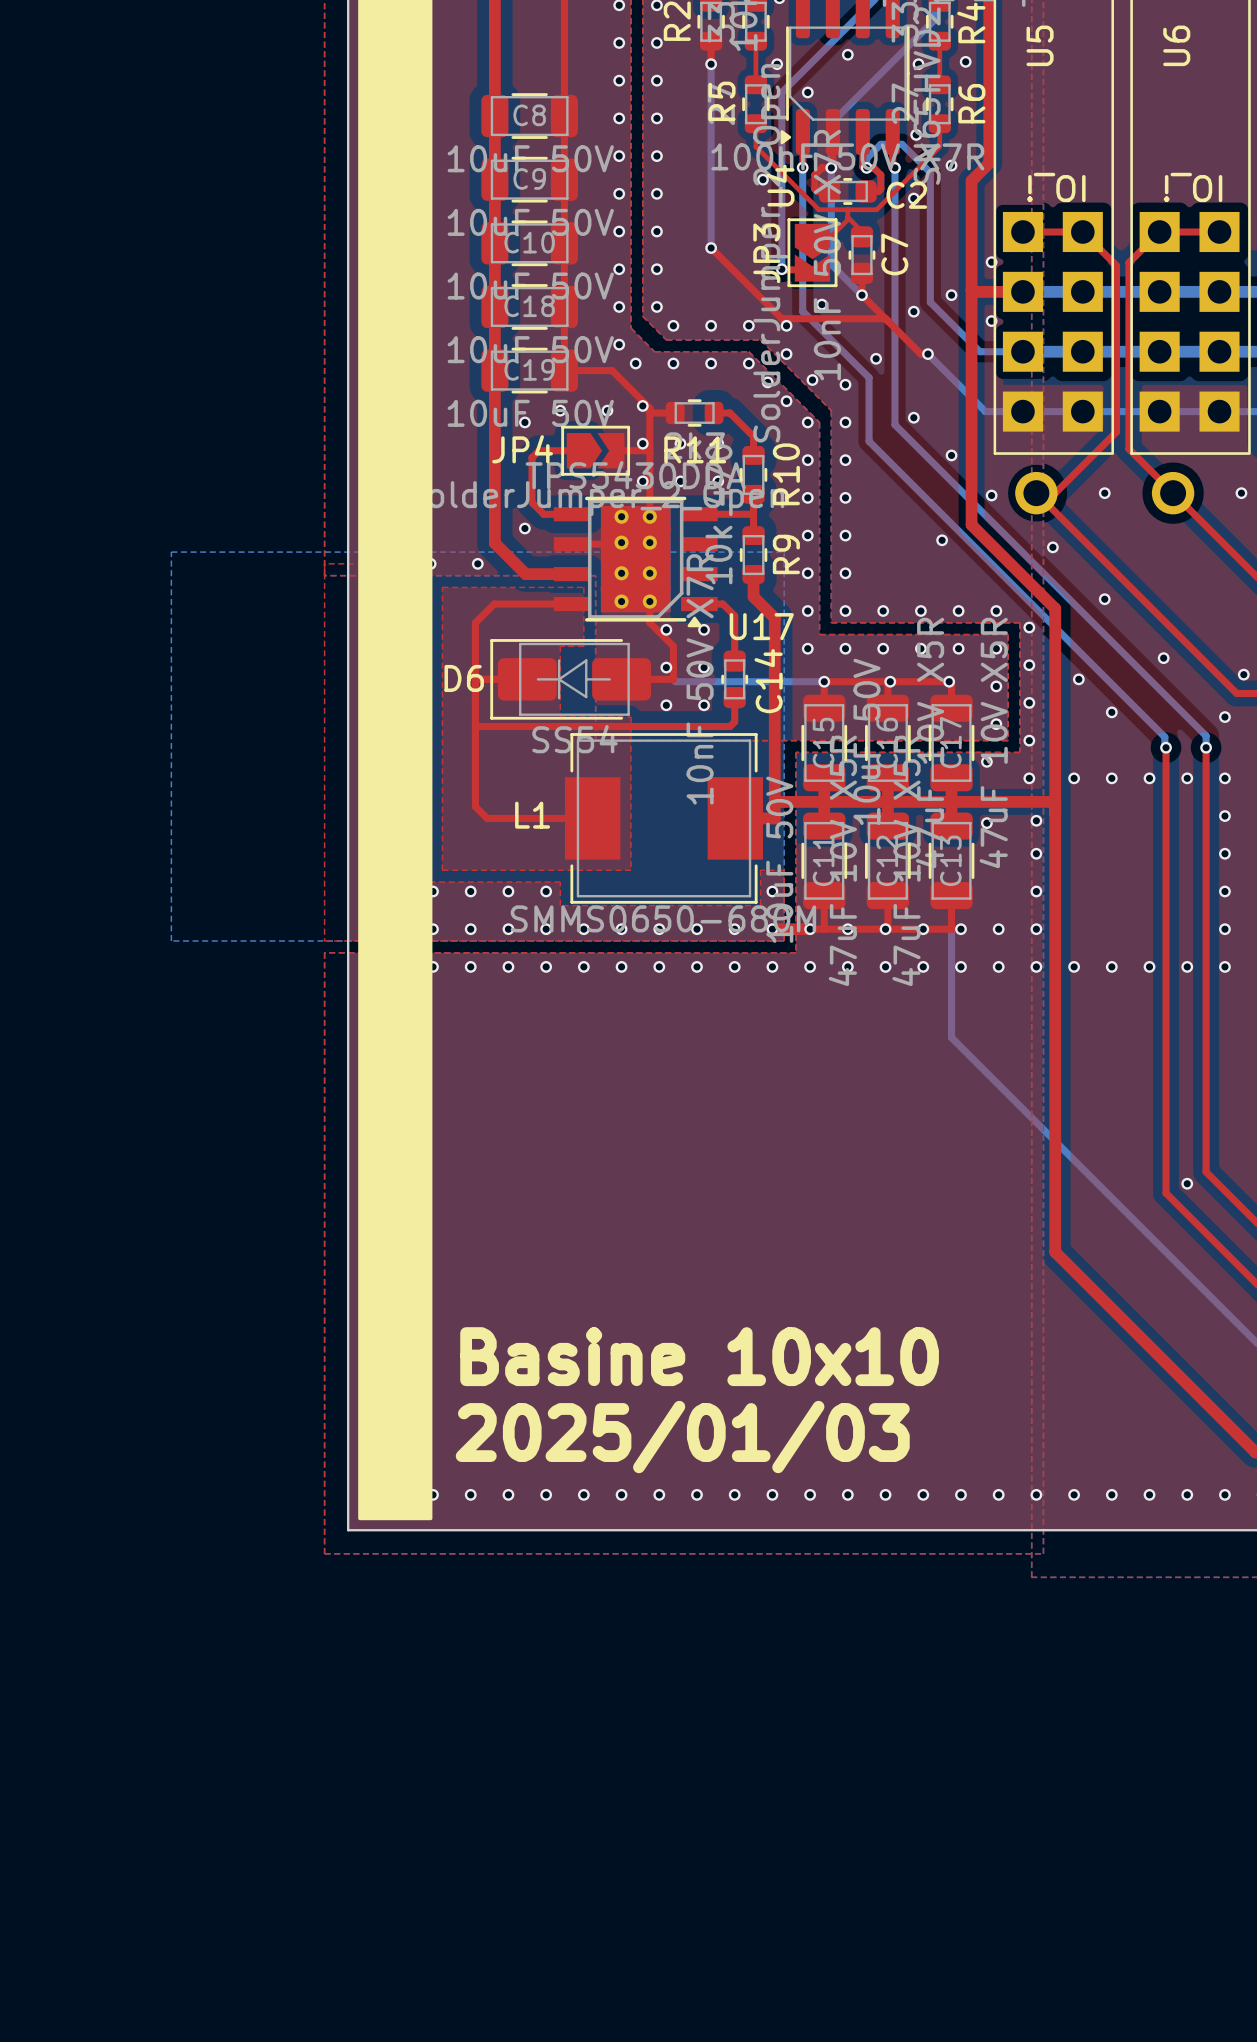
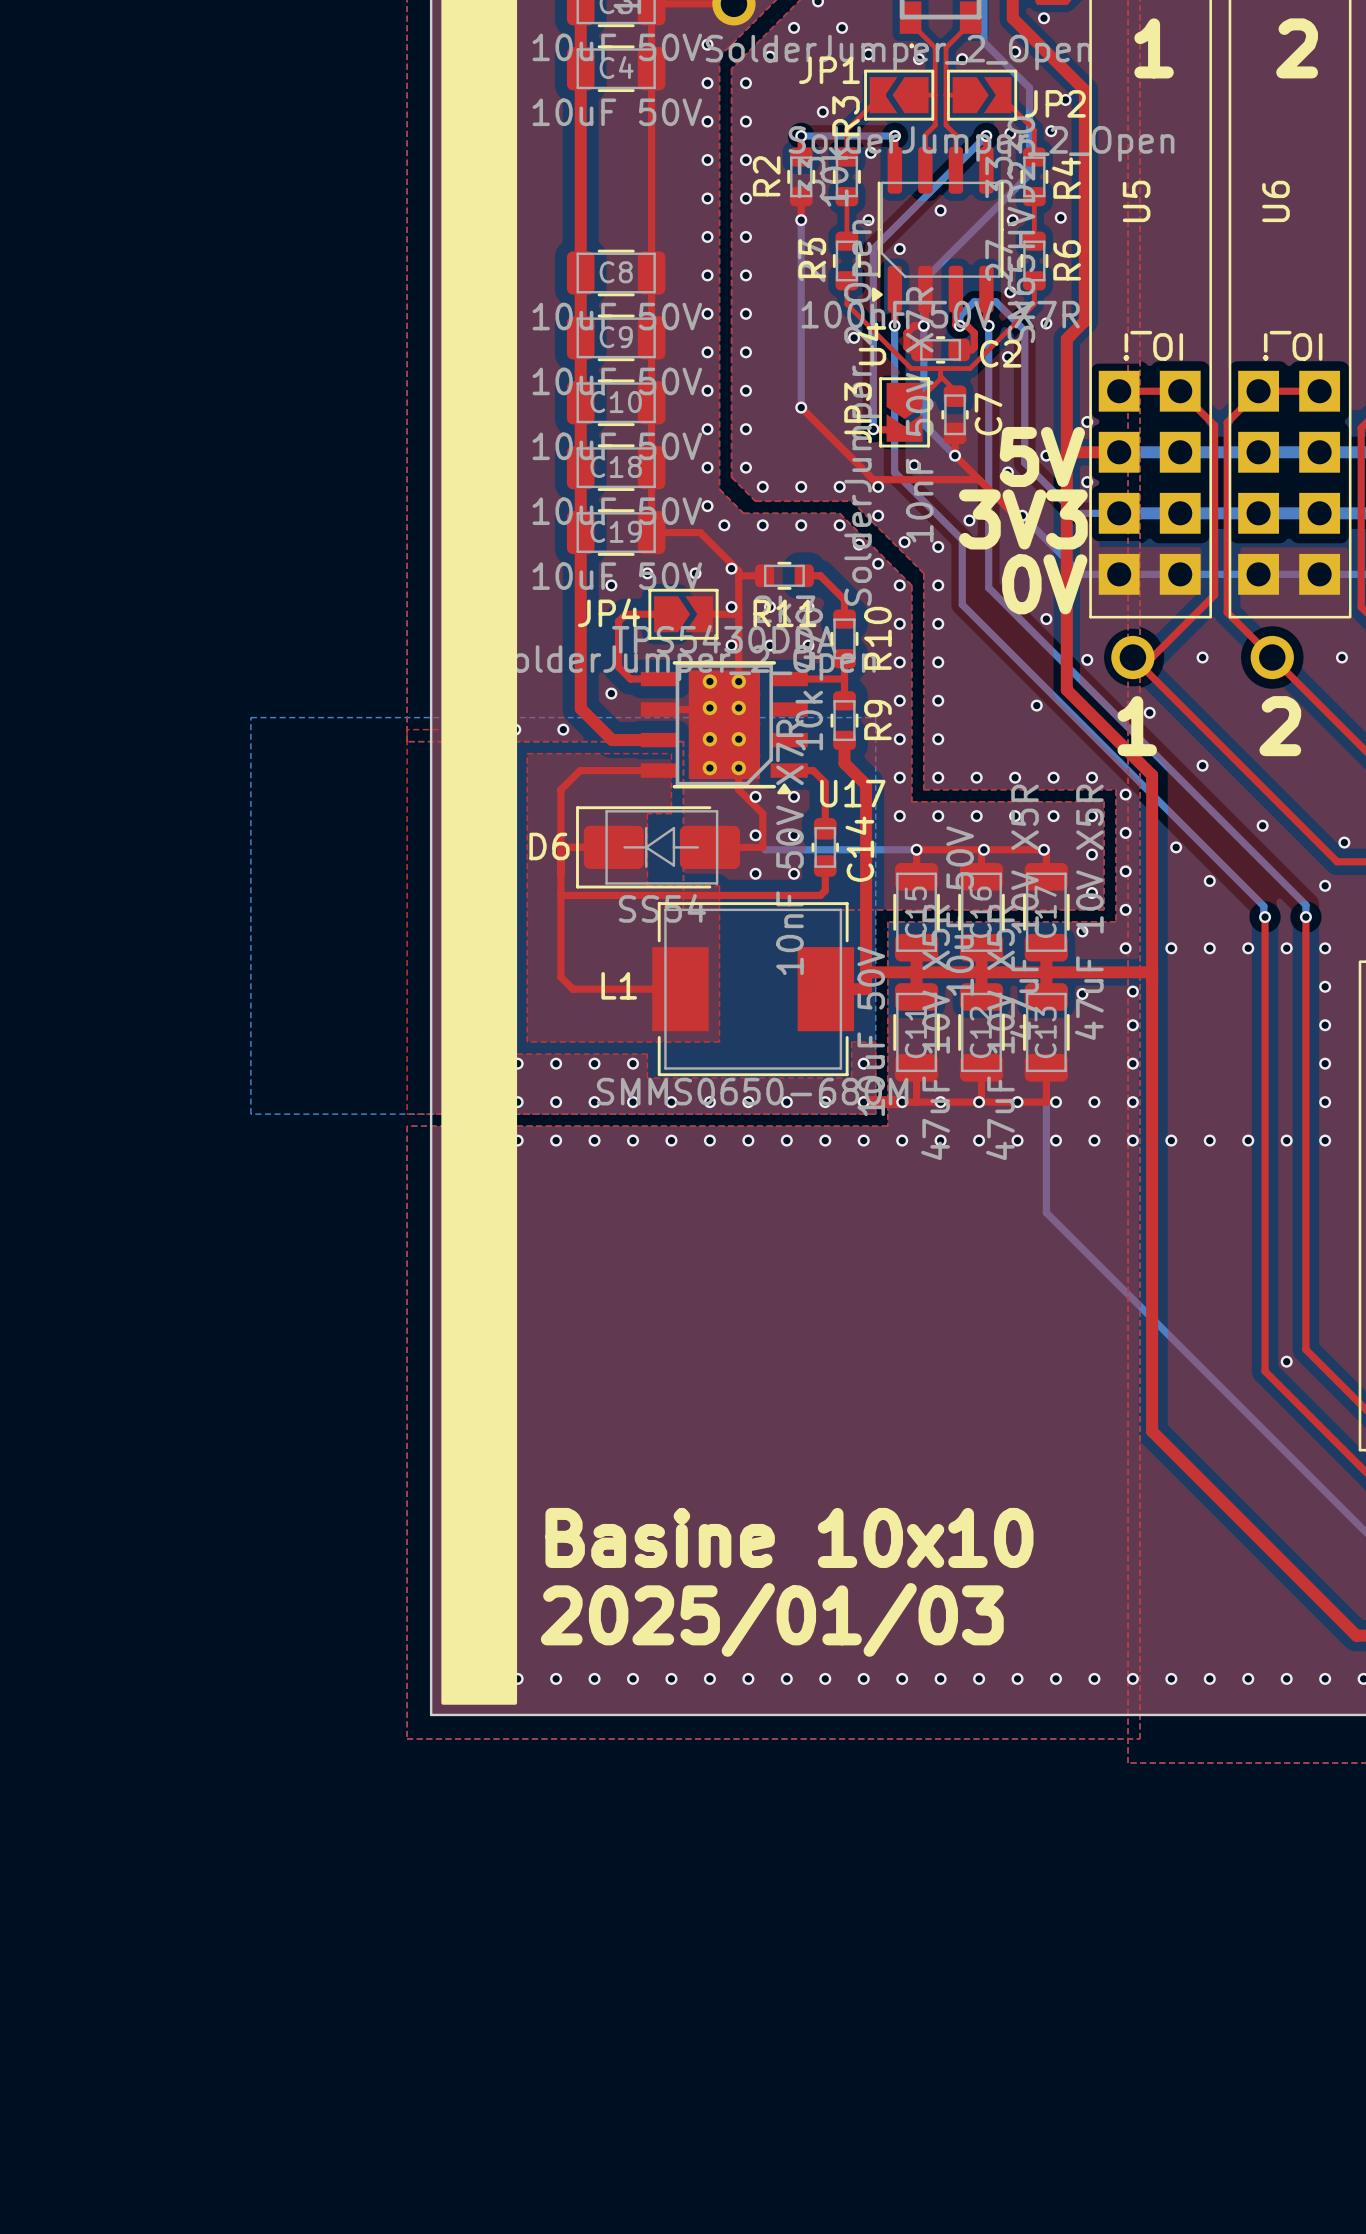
text: none -> 5V (1042, 456)
text: none -> 3V3 (1023, 519)
text: none -> 0V (1044, 584)
text: none -> 1 (1137, 726)
text: none -> 2 (1280, 726)

